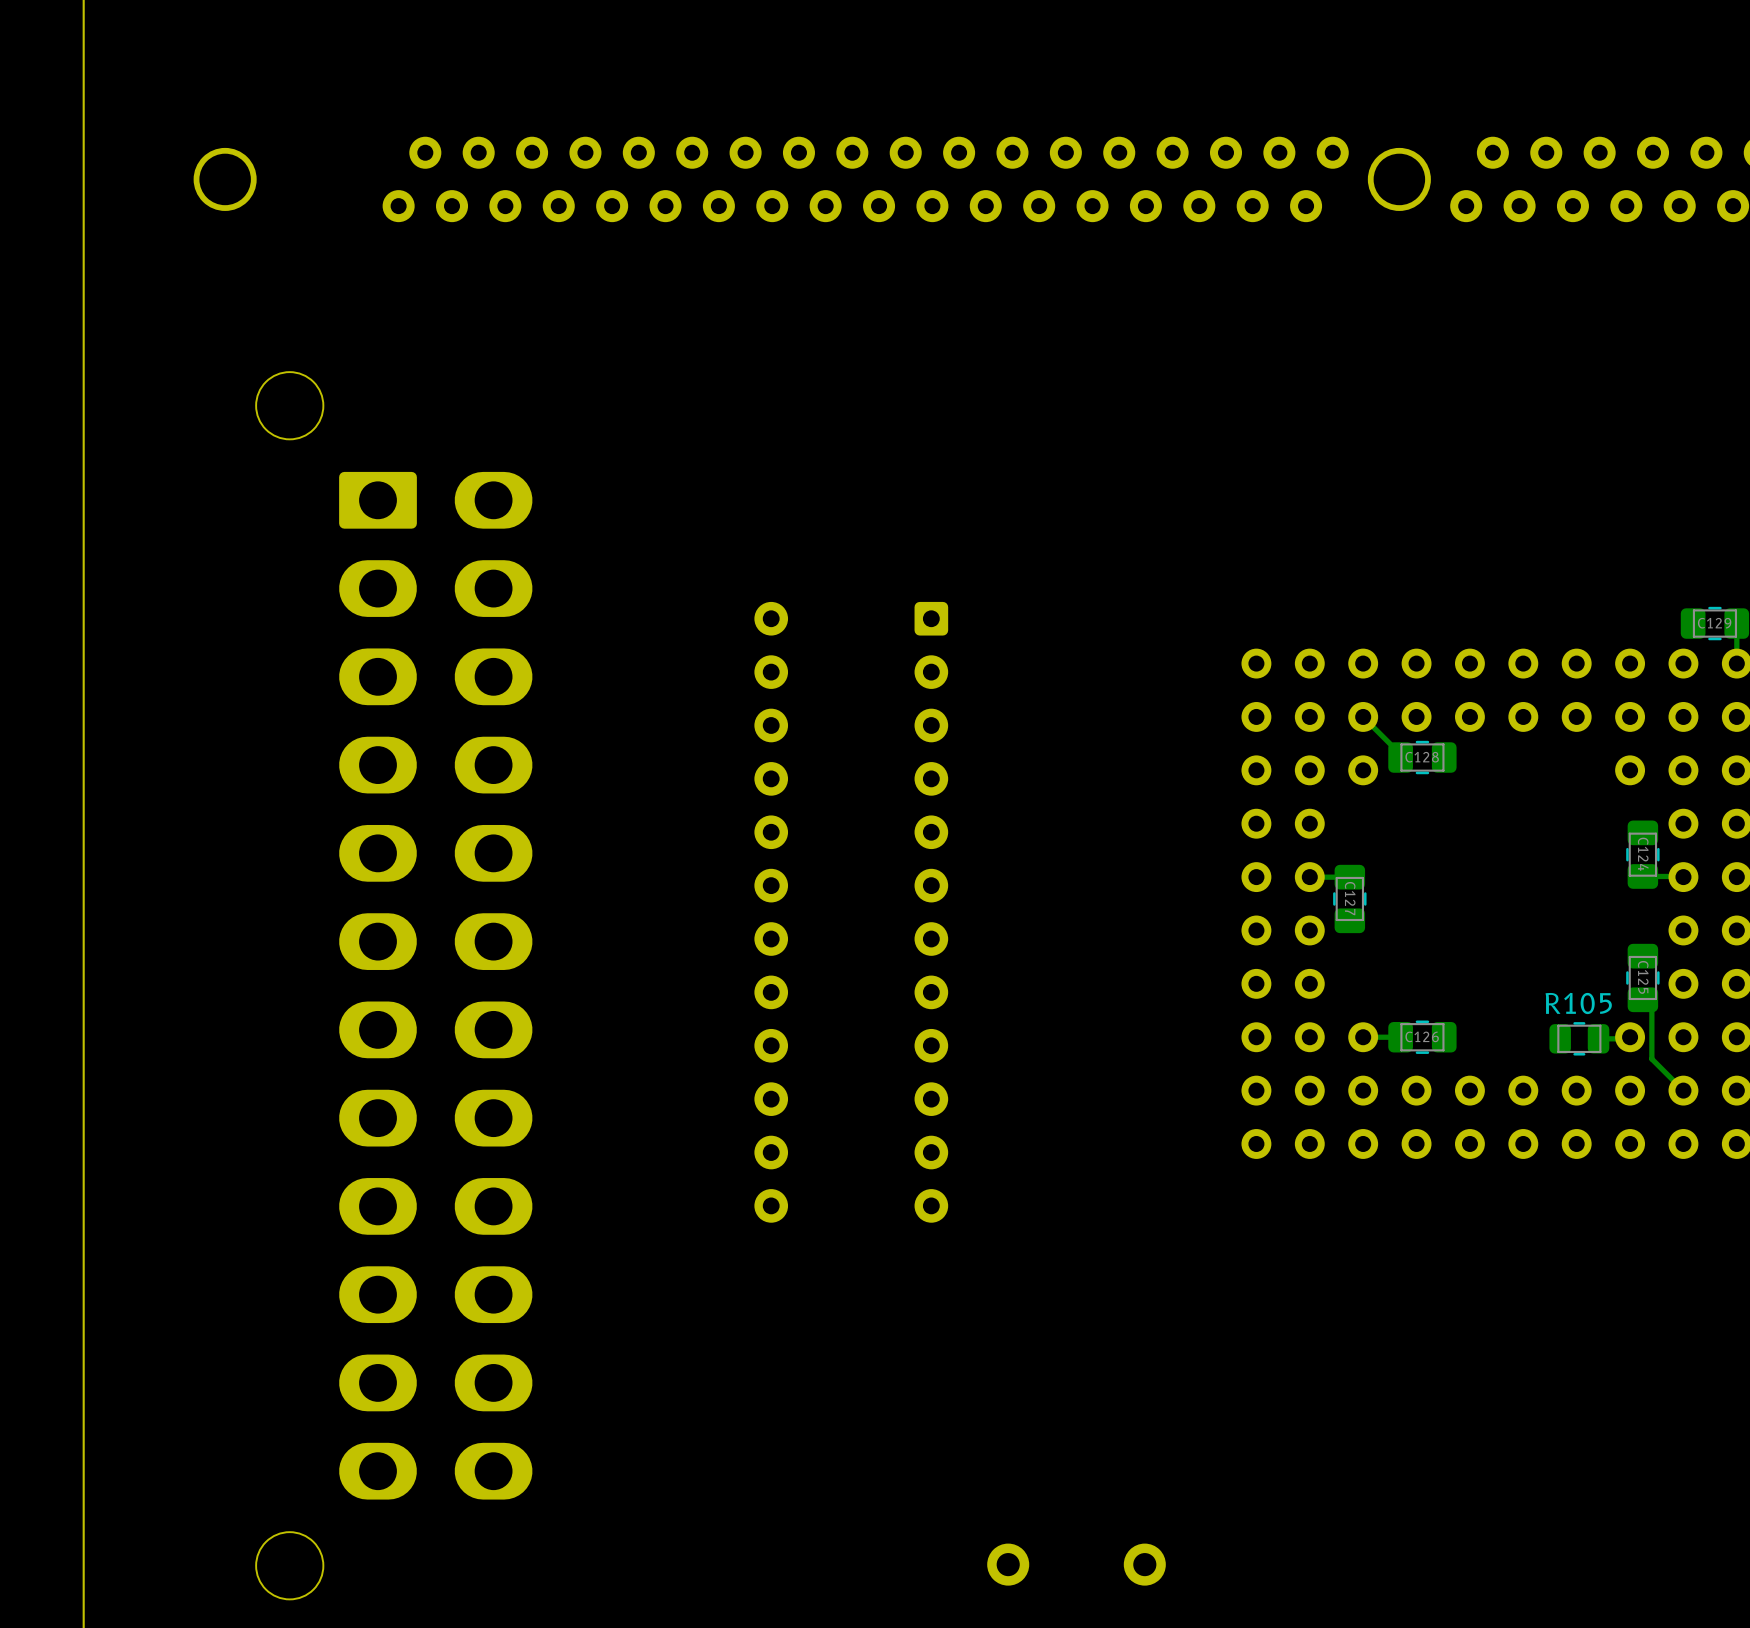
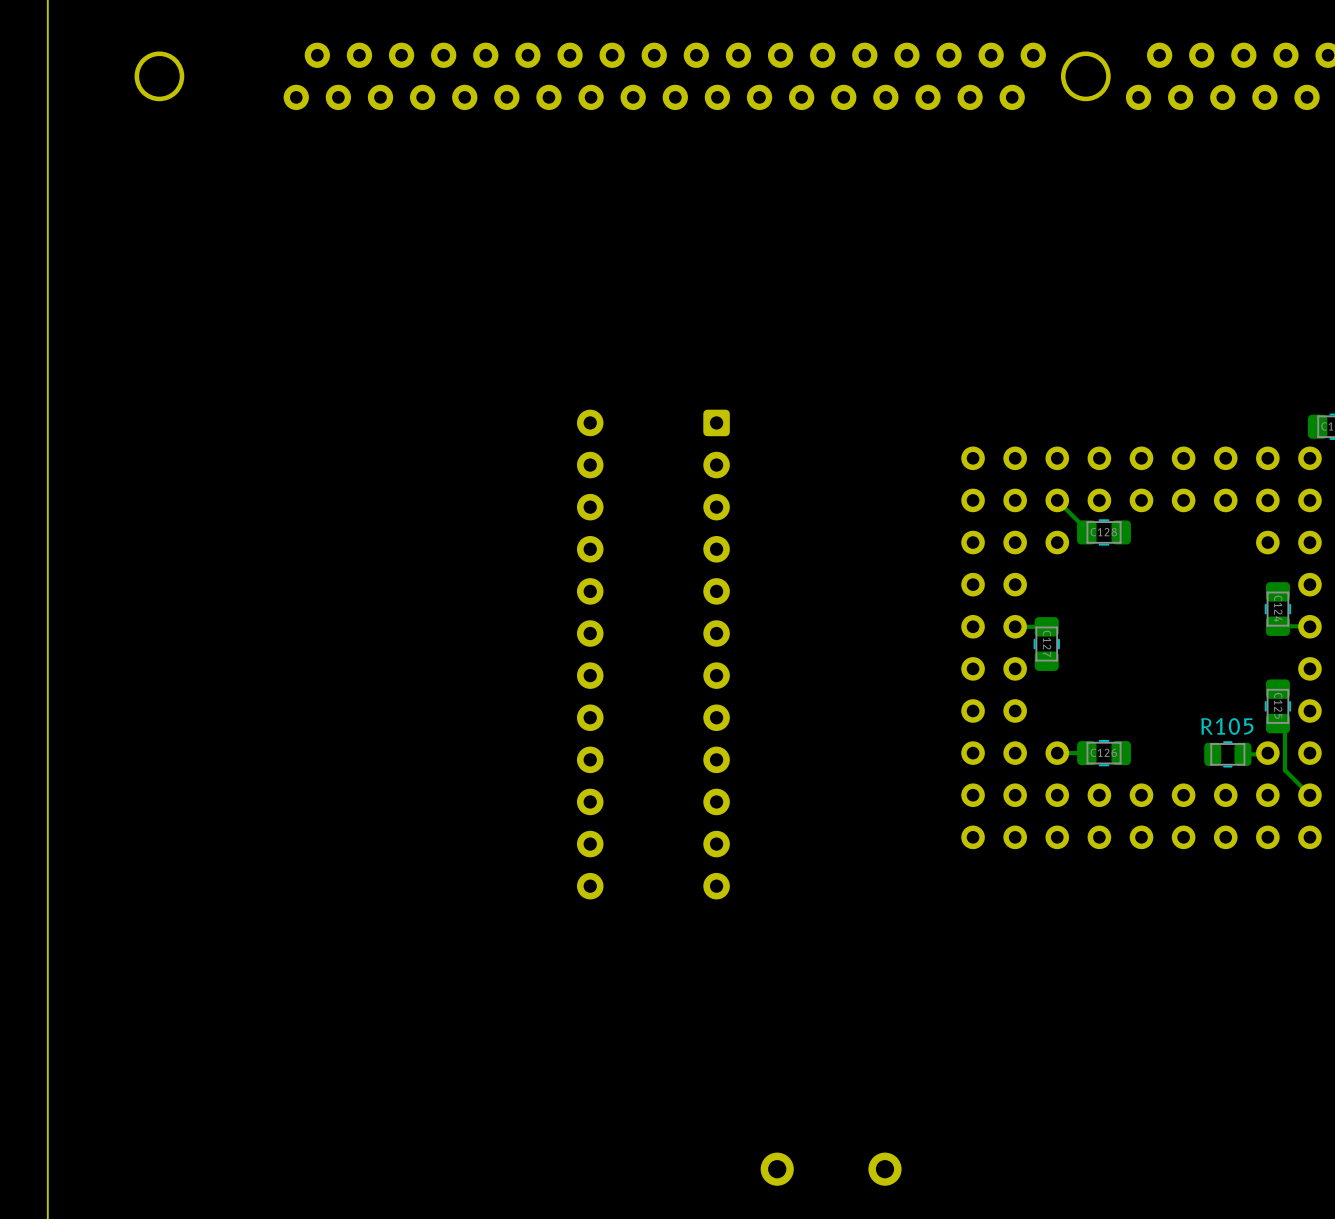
part: (394, 985) -> none

